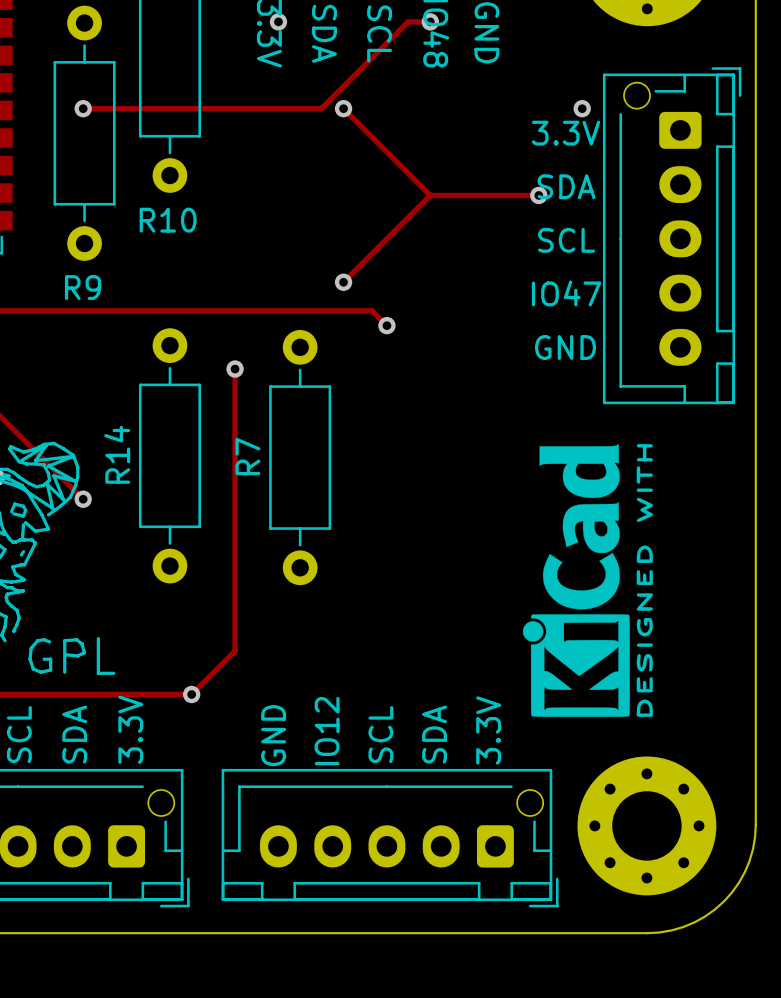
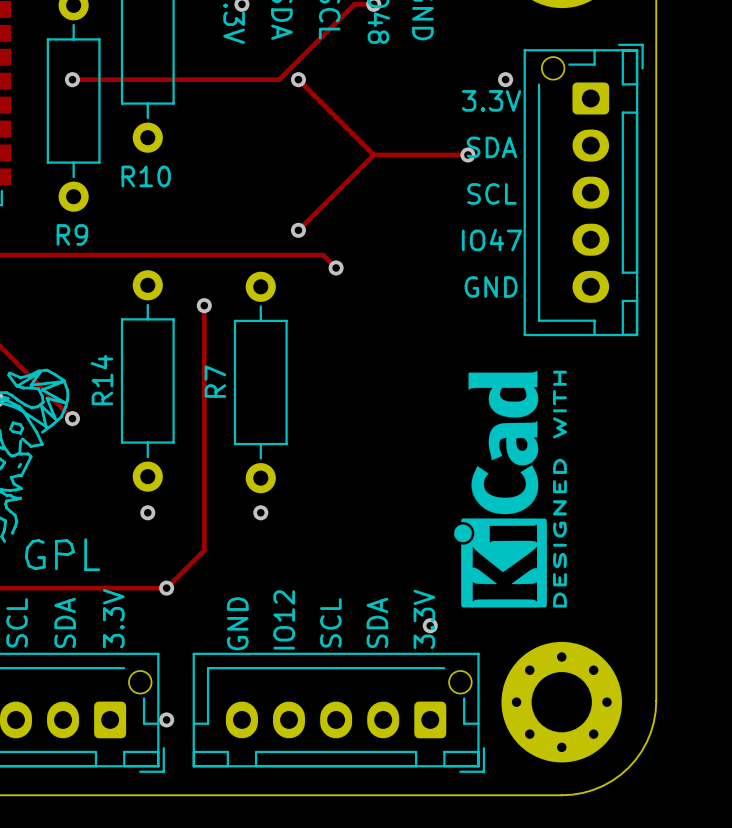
via: none -> (147, 512)
via: none -> (260, 512)
via: none -> (430, 625)
via: none -> (166, 719)

